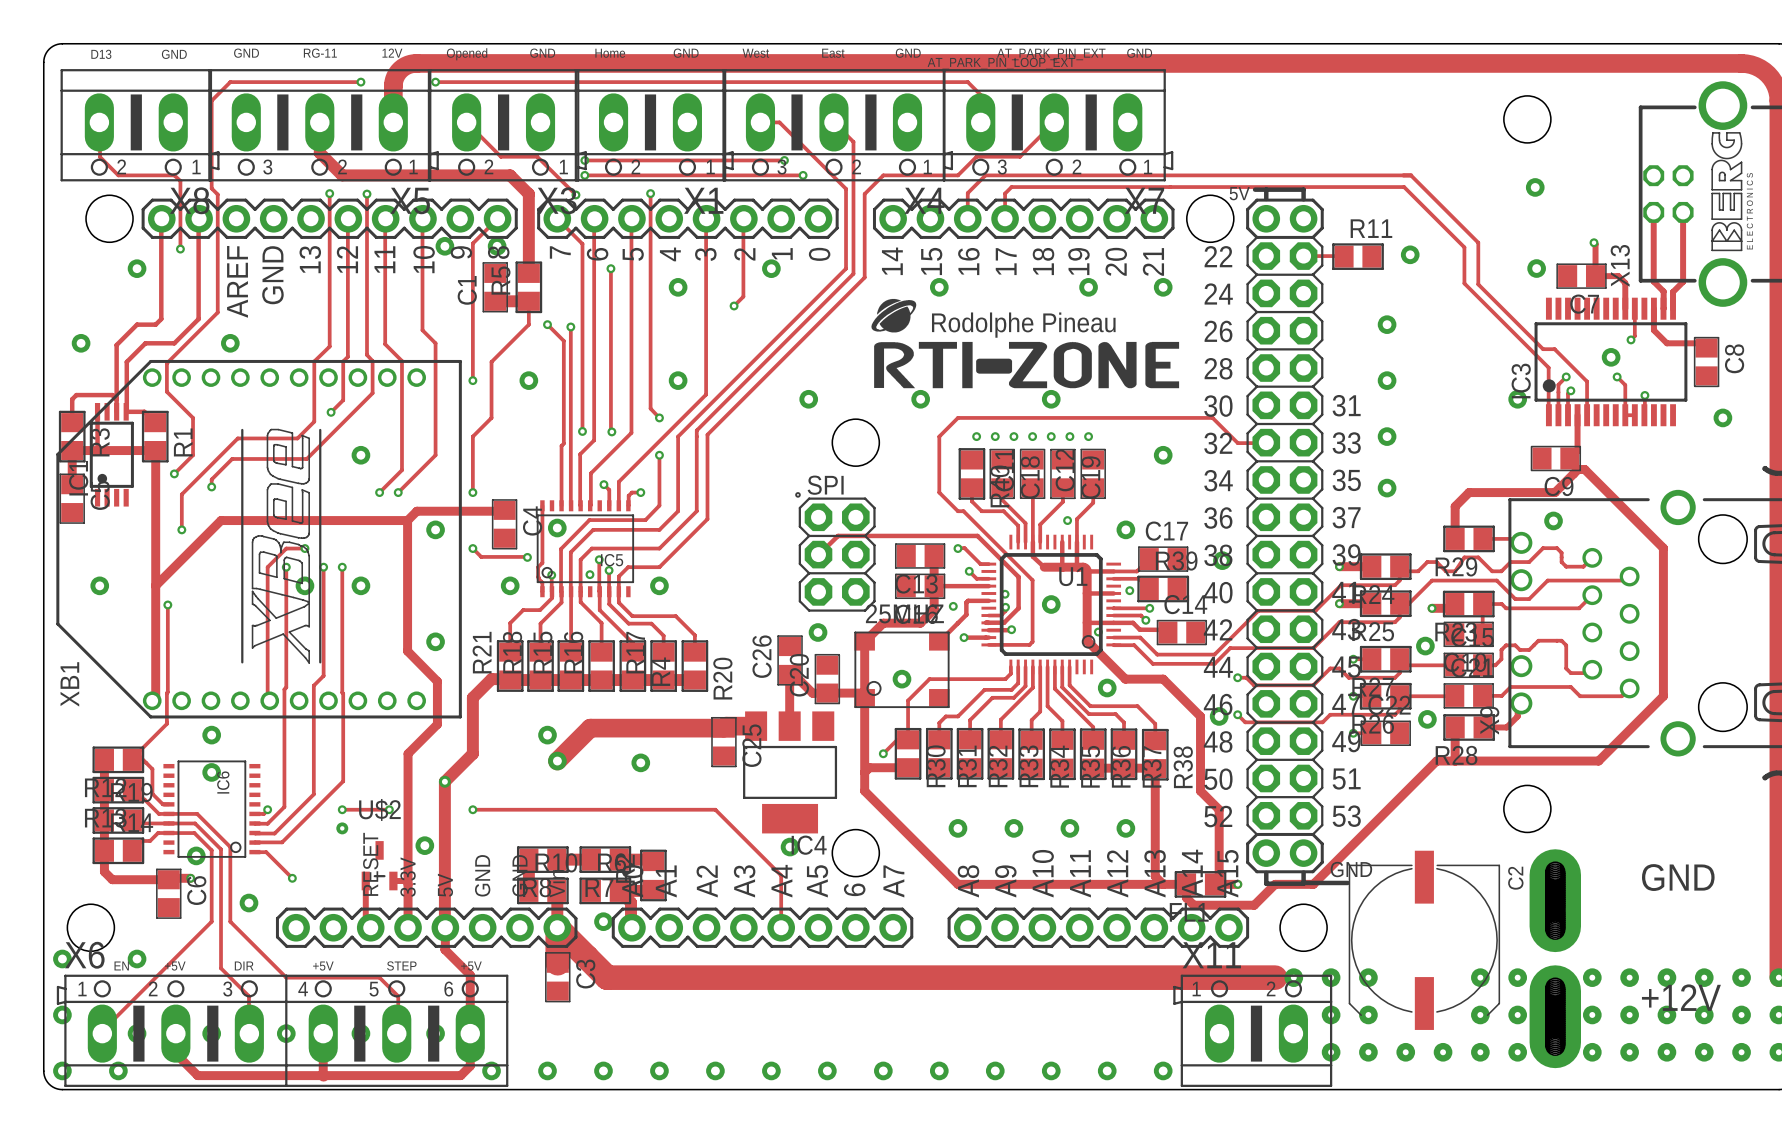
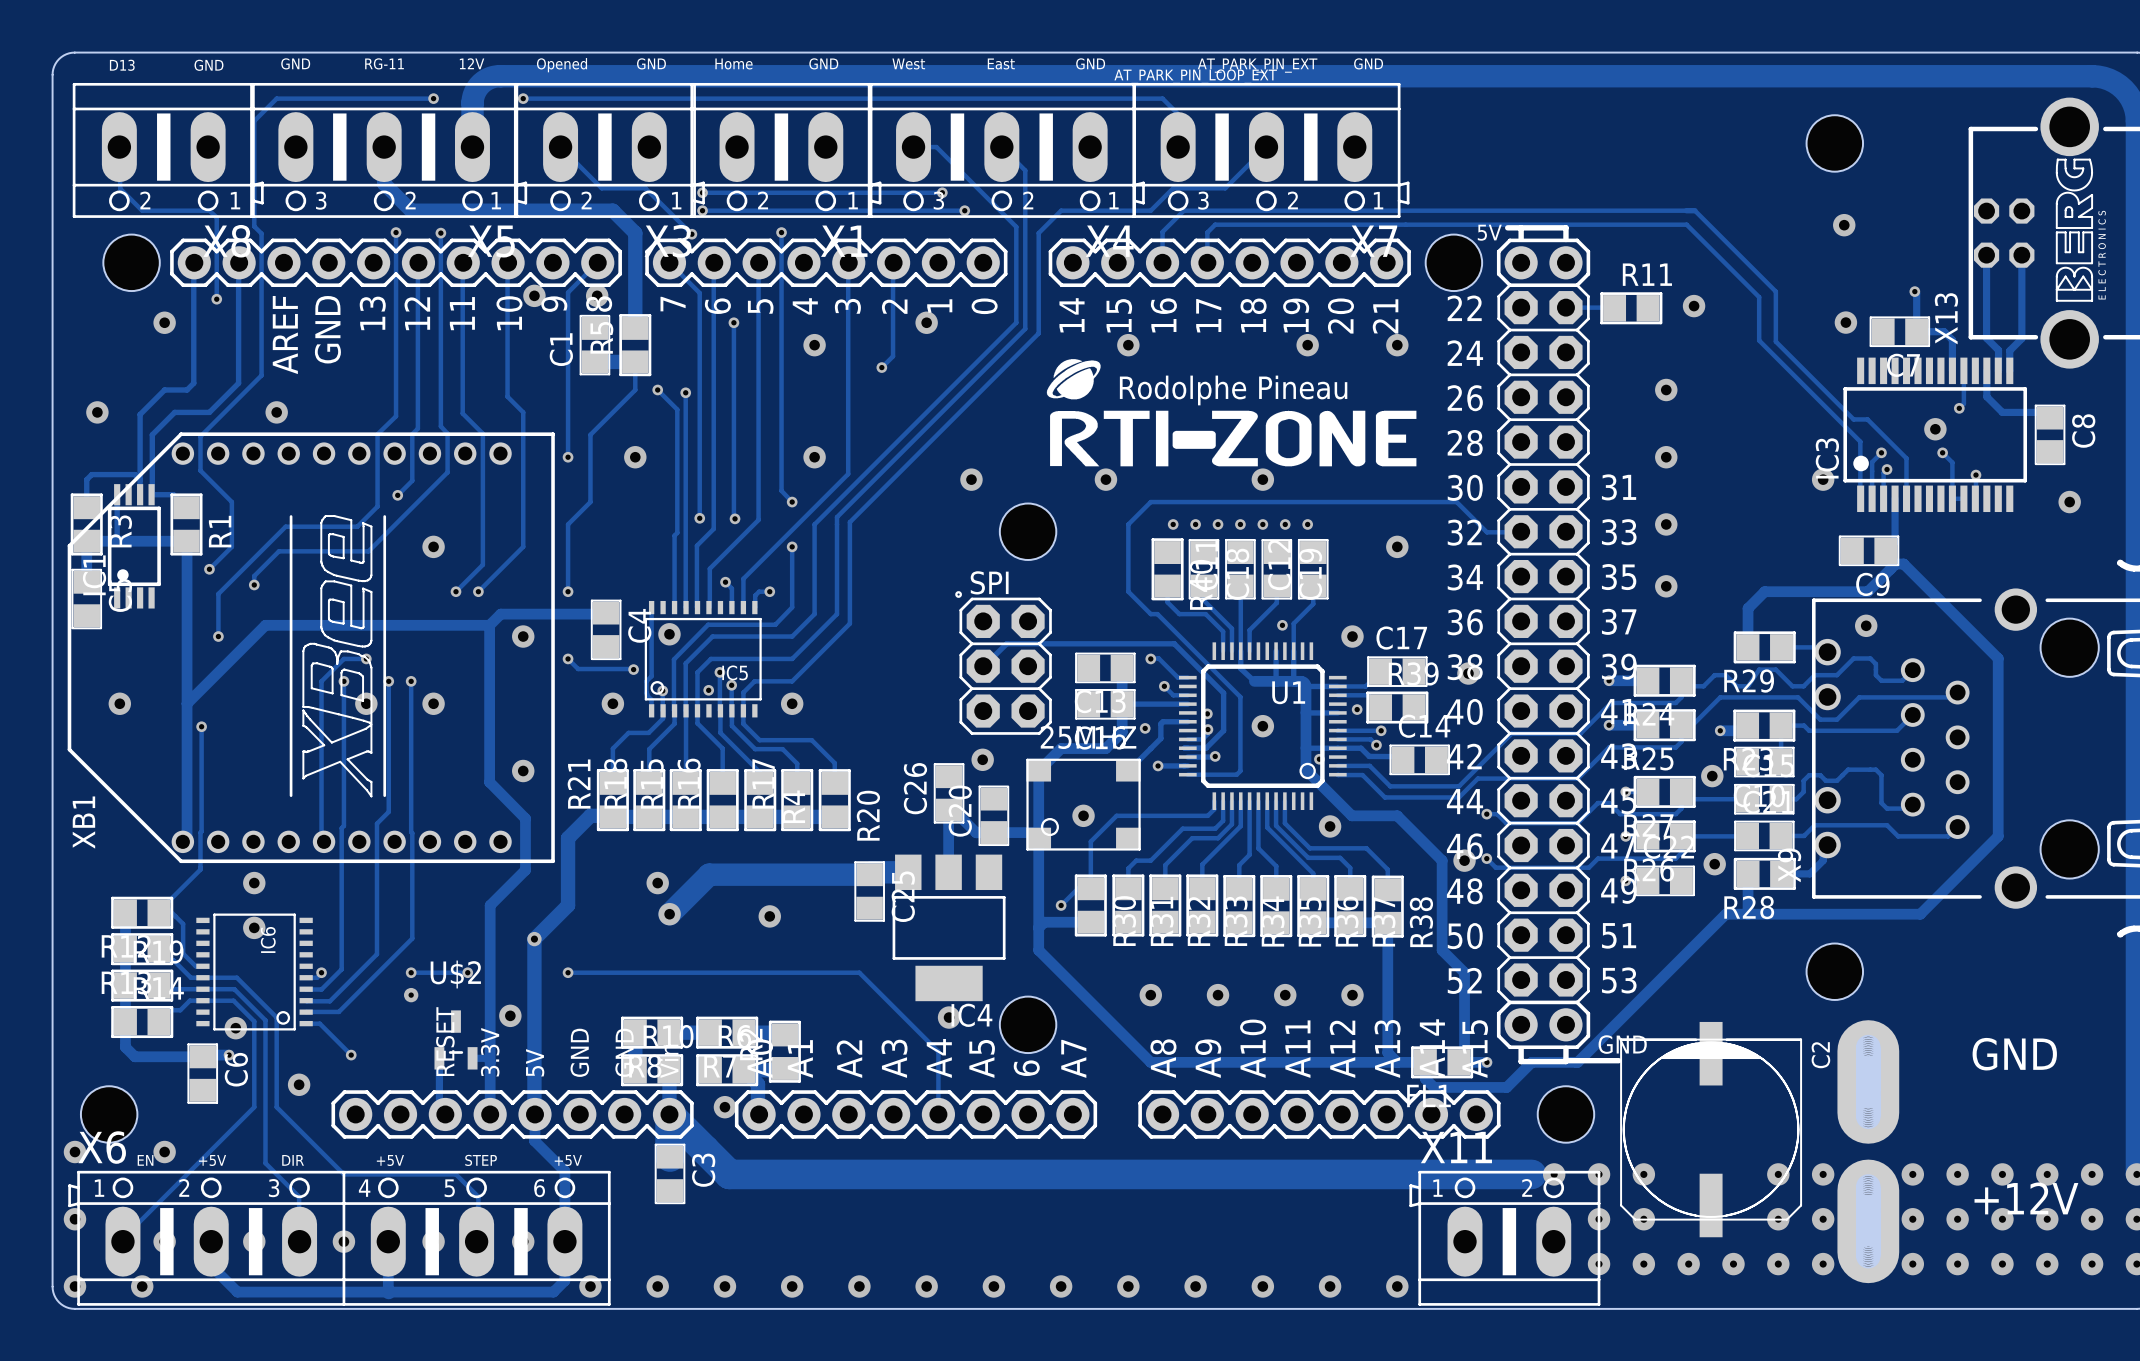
C2 footprint: [1348, 850, 1501, 1030] -> [1620, 1021, 1802, 1238]

